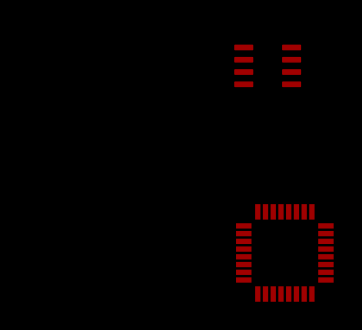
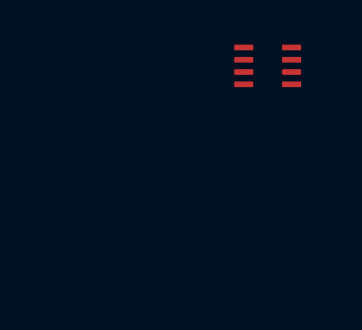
part: (284, 252) -> none

